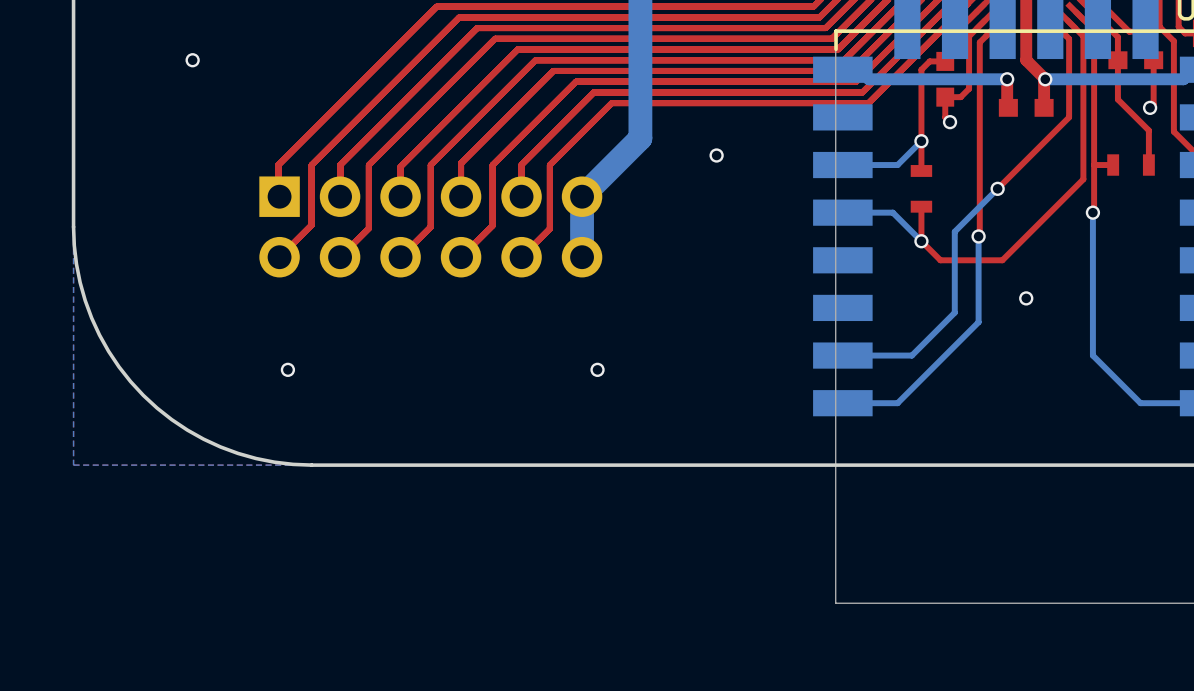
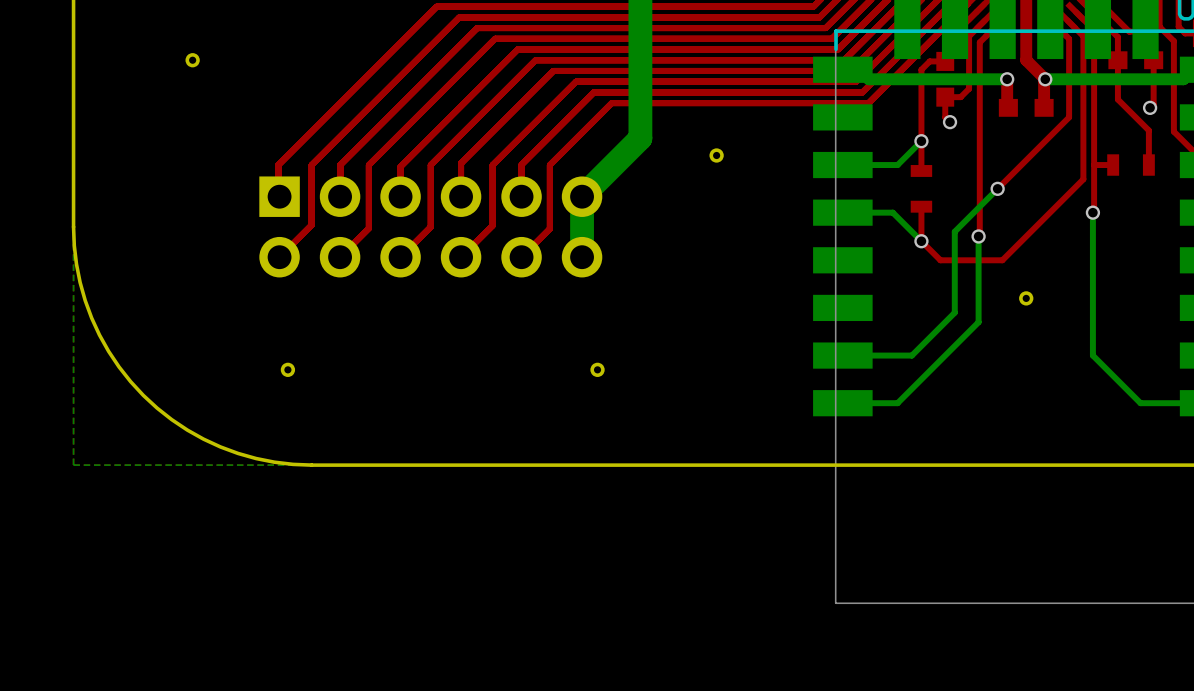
via: (192, 60) -> none
part: none -> (192, 60)
via: (716, 155) -> none
part: none -> (716, 155)
via: (1026, 298) -> none
part: none -> (1026, 298)
via: (287, 369) -> none
part: none -> (287, 369)
via: (597, 369) -> none
part: none -> (597, 369)

